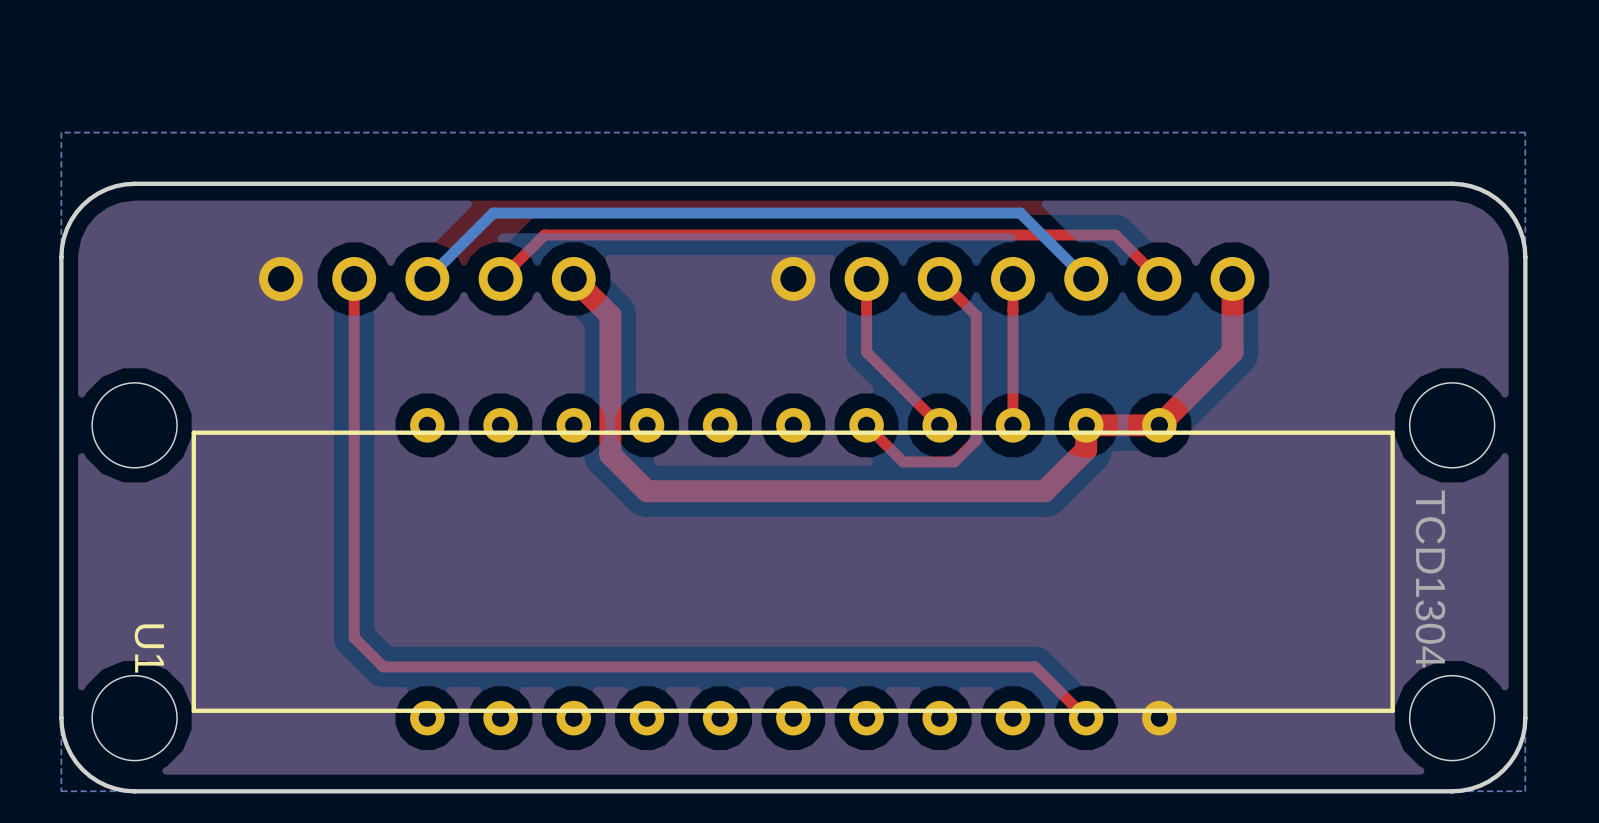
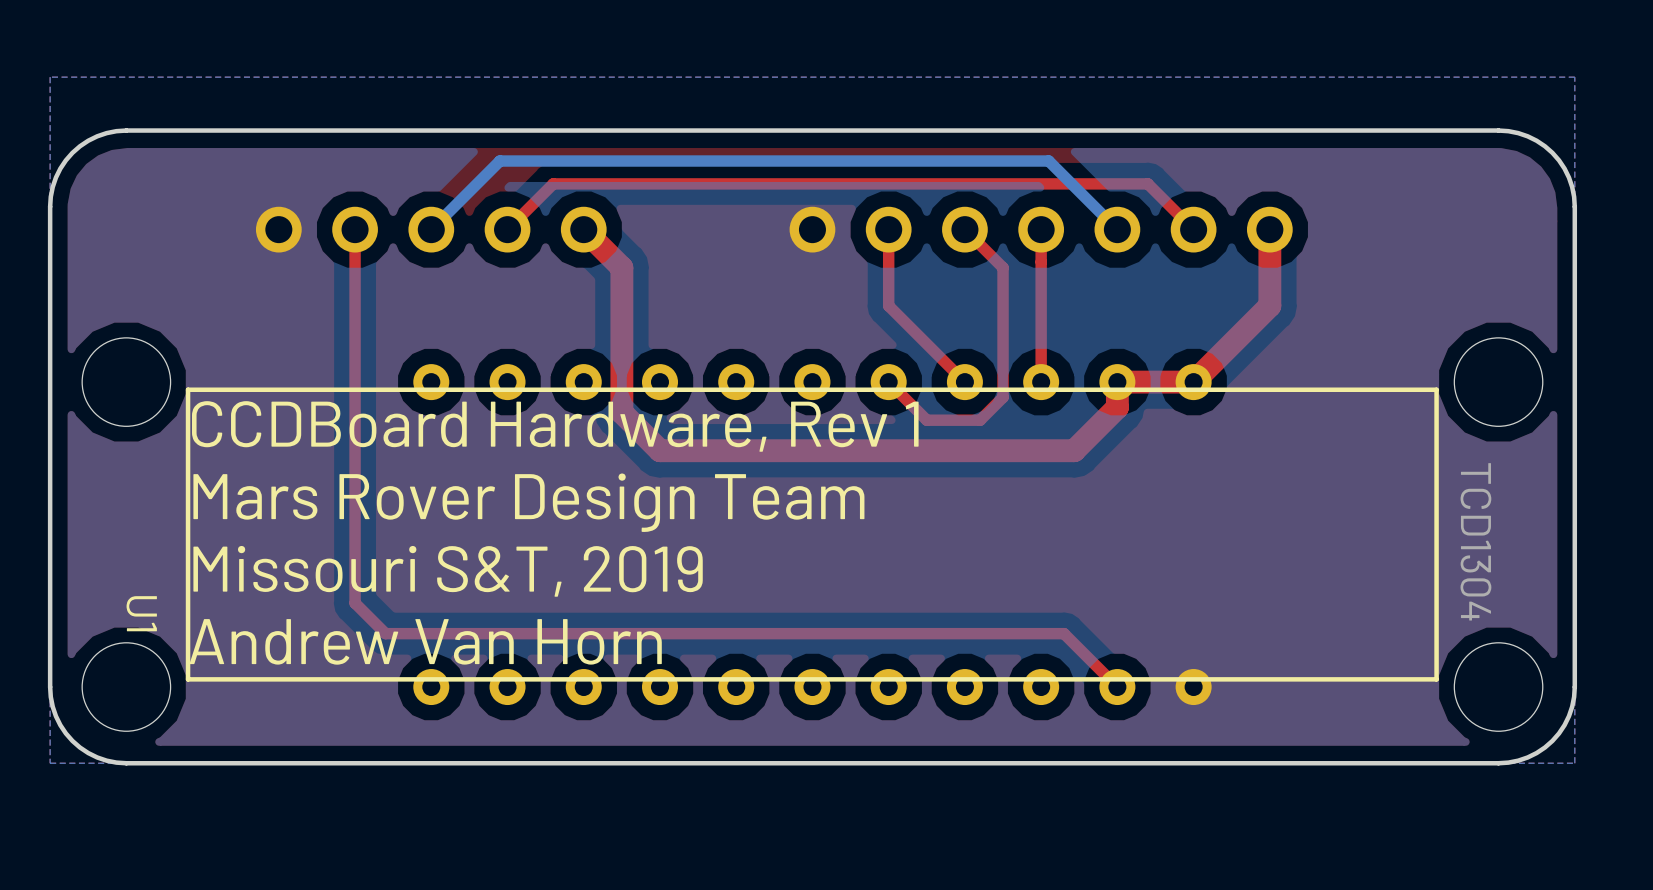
text: none -> CCDBoard Hardware, Rev 1 (555, 426)
text: none -> Mars Rover Design Team (528, 502)
text: none -> Missouri S&T, 2019 (448, 571)
text: none -> Andrew Van Horn (425, 641)

